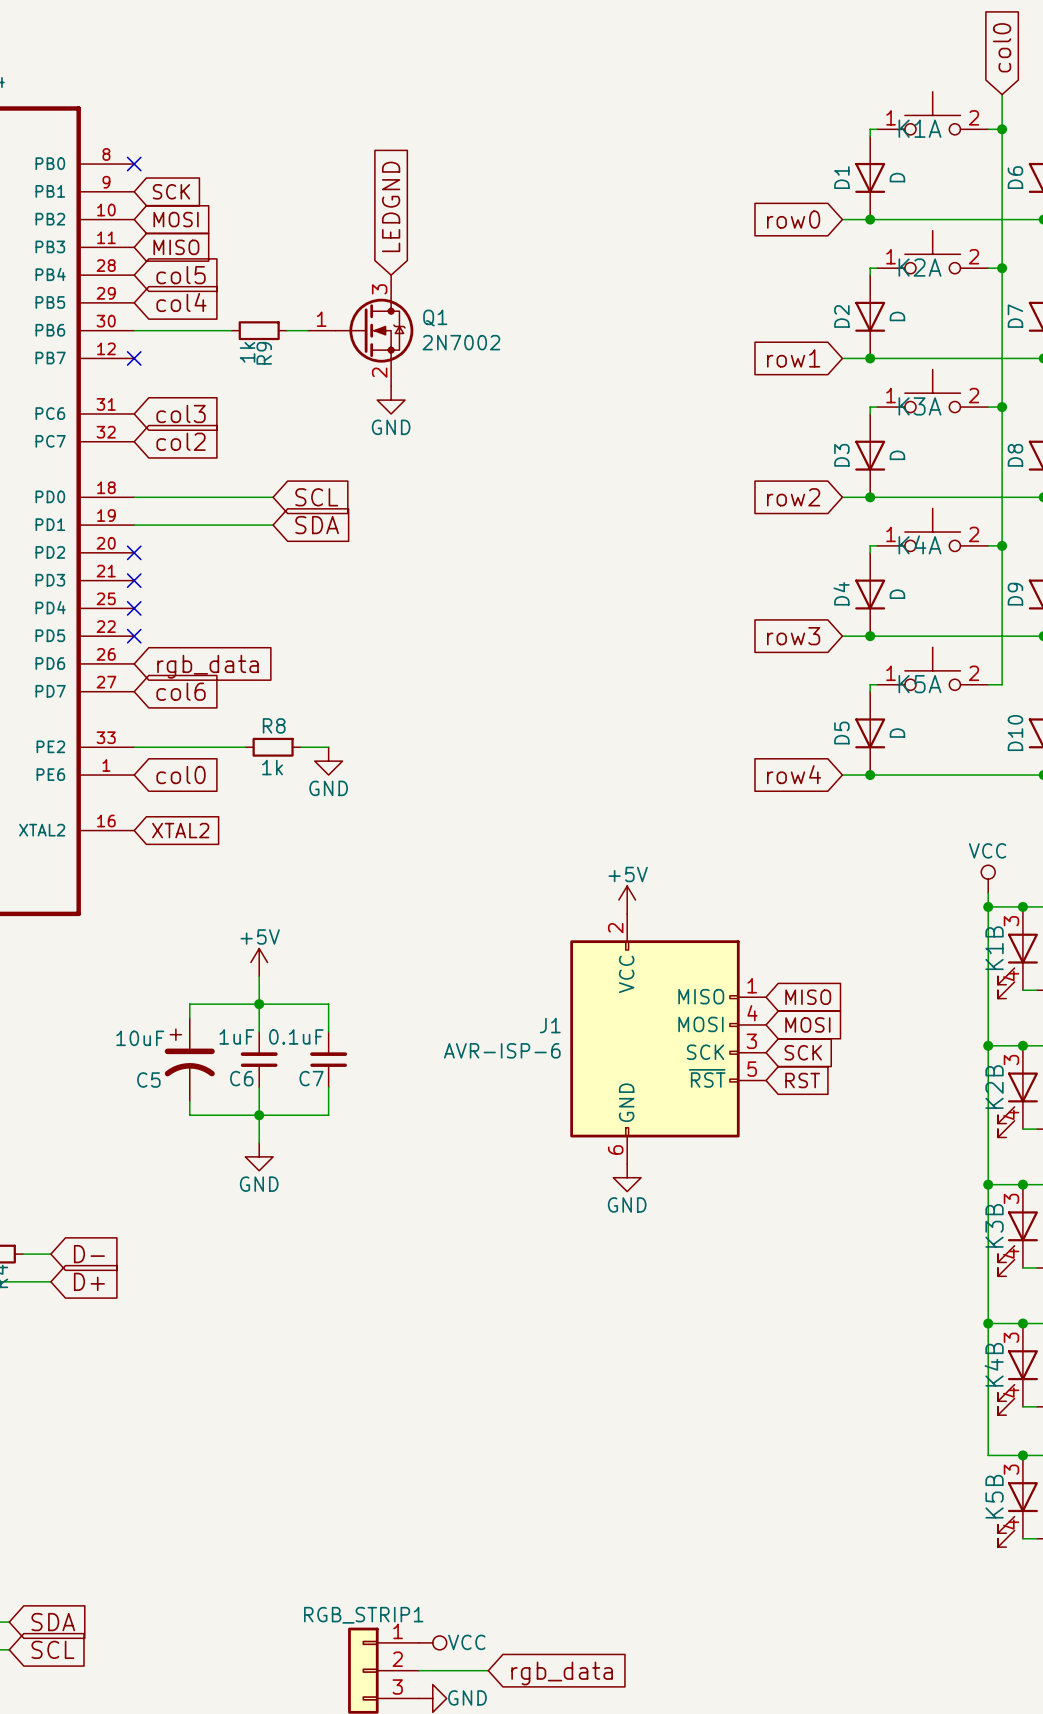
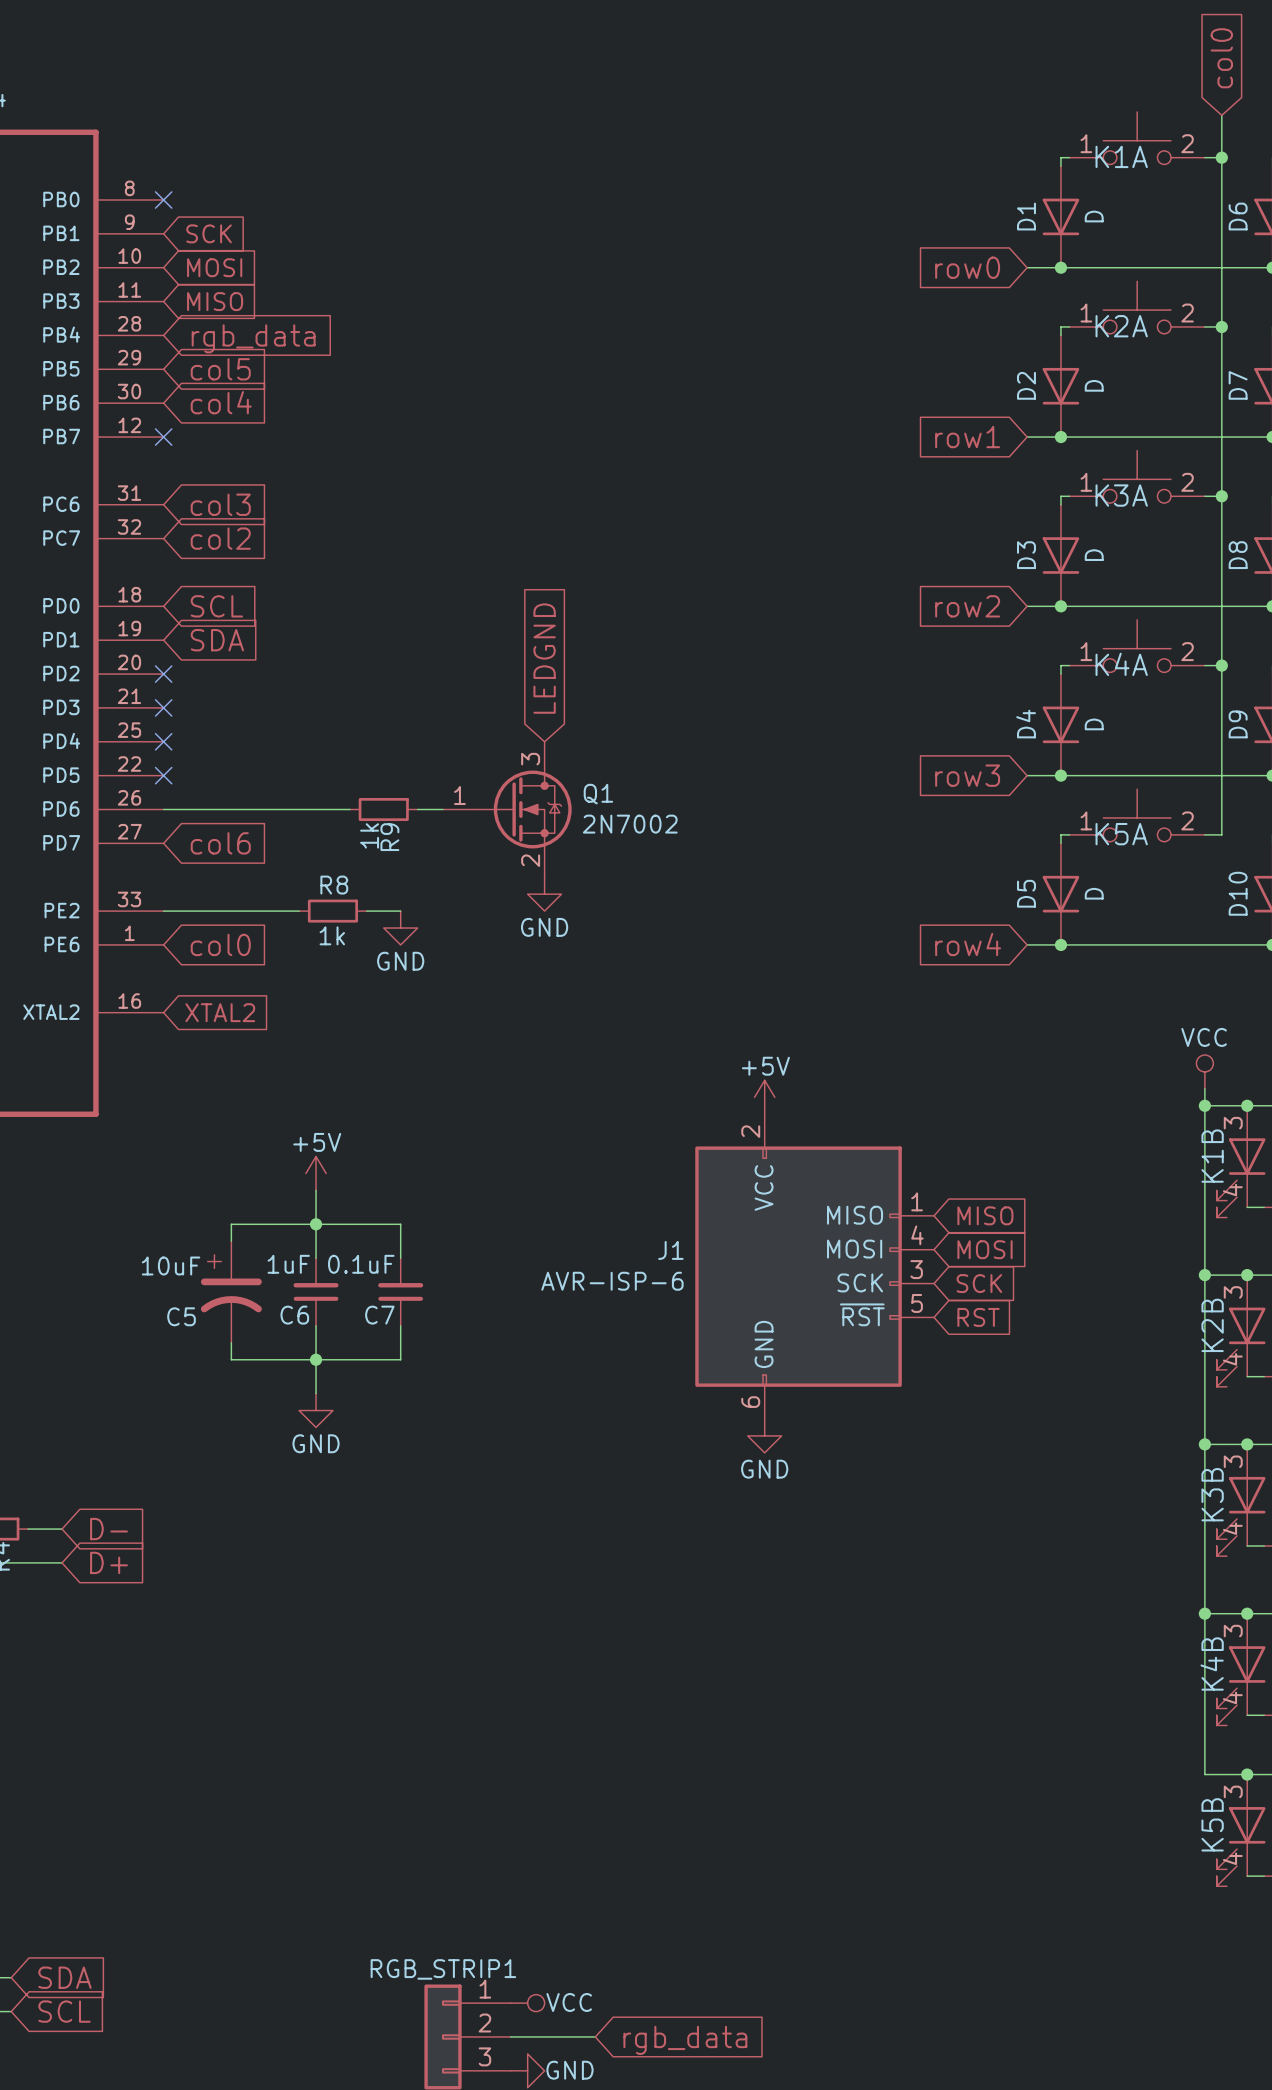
global label: LEDGND (391, 206) -> none
global label: col5 (181, 275) -> rgb_data (253, 338)
global label: col4 (181, 302) -> col5 (220, 369)
wire: (134, 330) (231, 330) -> none
global label: none -> col4 (221, 402)
R9 position: (259, 330) -> (383, 809)
wire: (286, 330) (307, 330) -> none
Q1 position: (360, 330) -> (507, 809)
power symbol: GND (391, 400) -> none
wire: (134, 497) (273, 497) -> none
global label position: SCL (316, 497) -> SCL (216, 606)
wire: (134, 525) (273, 525) -> none
global label position: SDA (317, 525) -> SDA (217, 640)
global label: none -> LEDGND (544, 658)
wire: none -> (163, 809) (349, 809)
wire: none -> (417, 809) (443, 809)
global label: rgb_data (208, 666) -> none
power symbol: none -> GND (544, 894)

